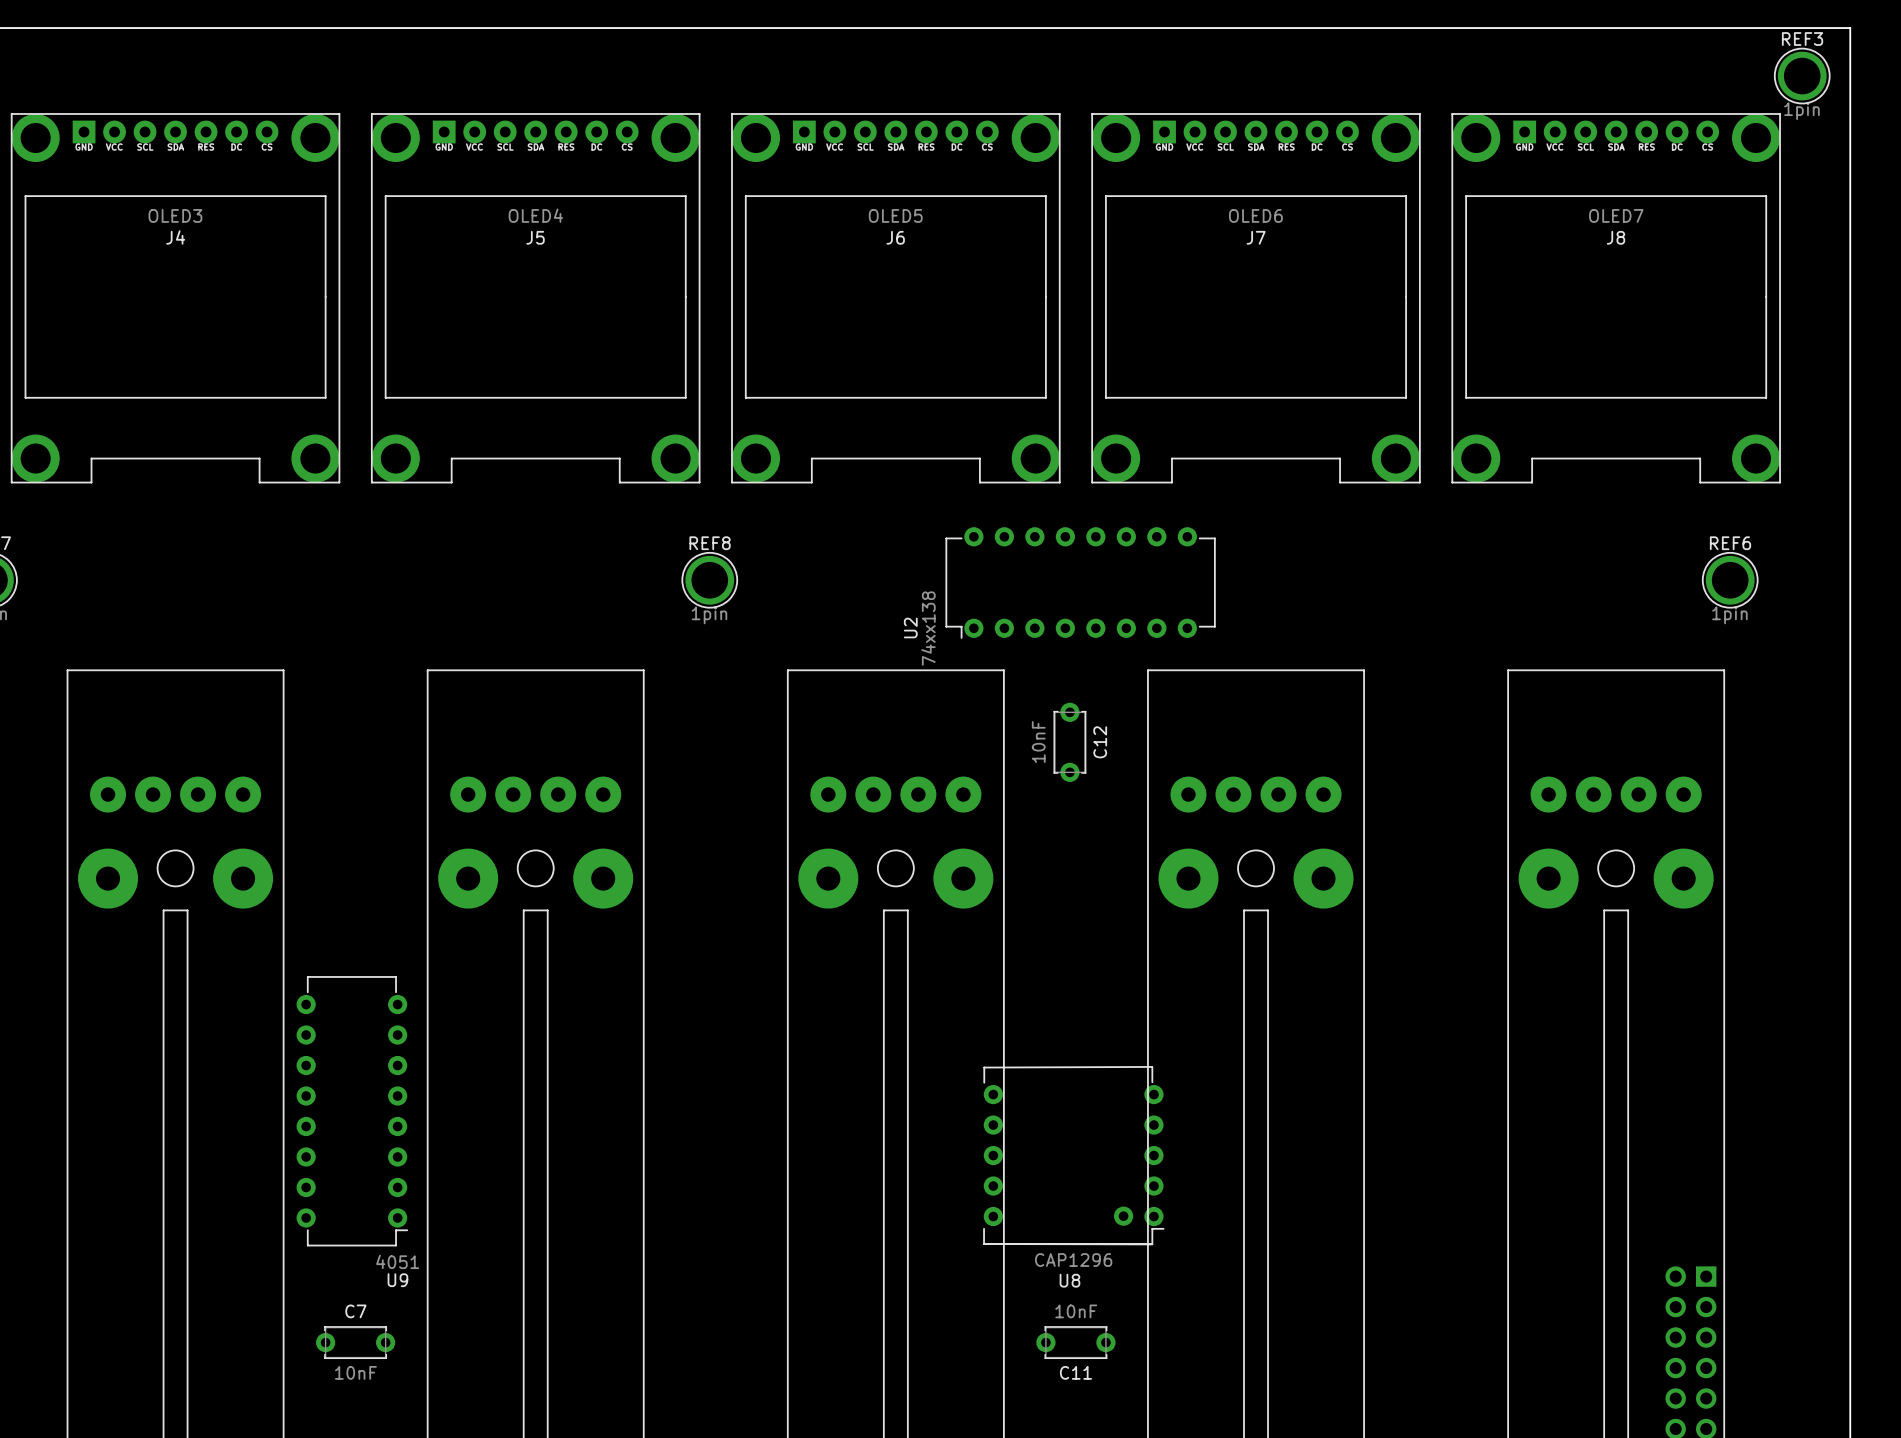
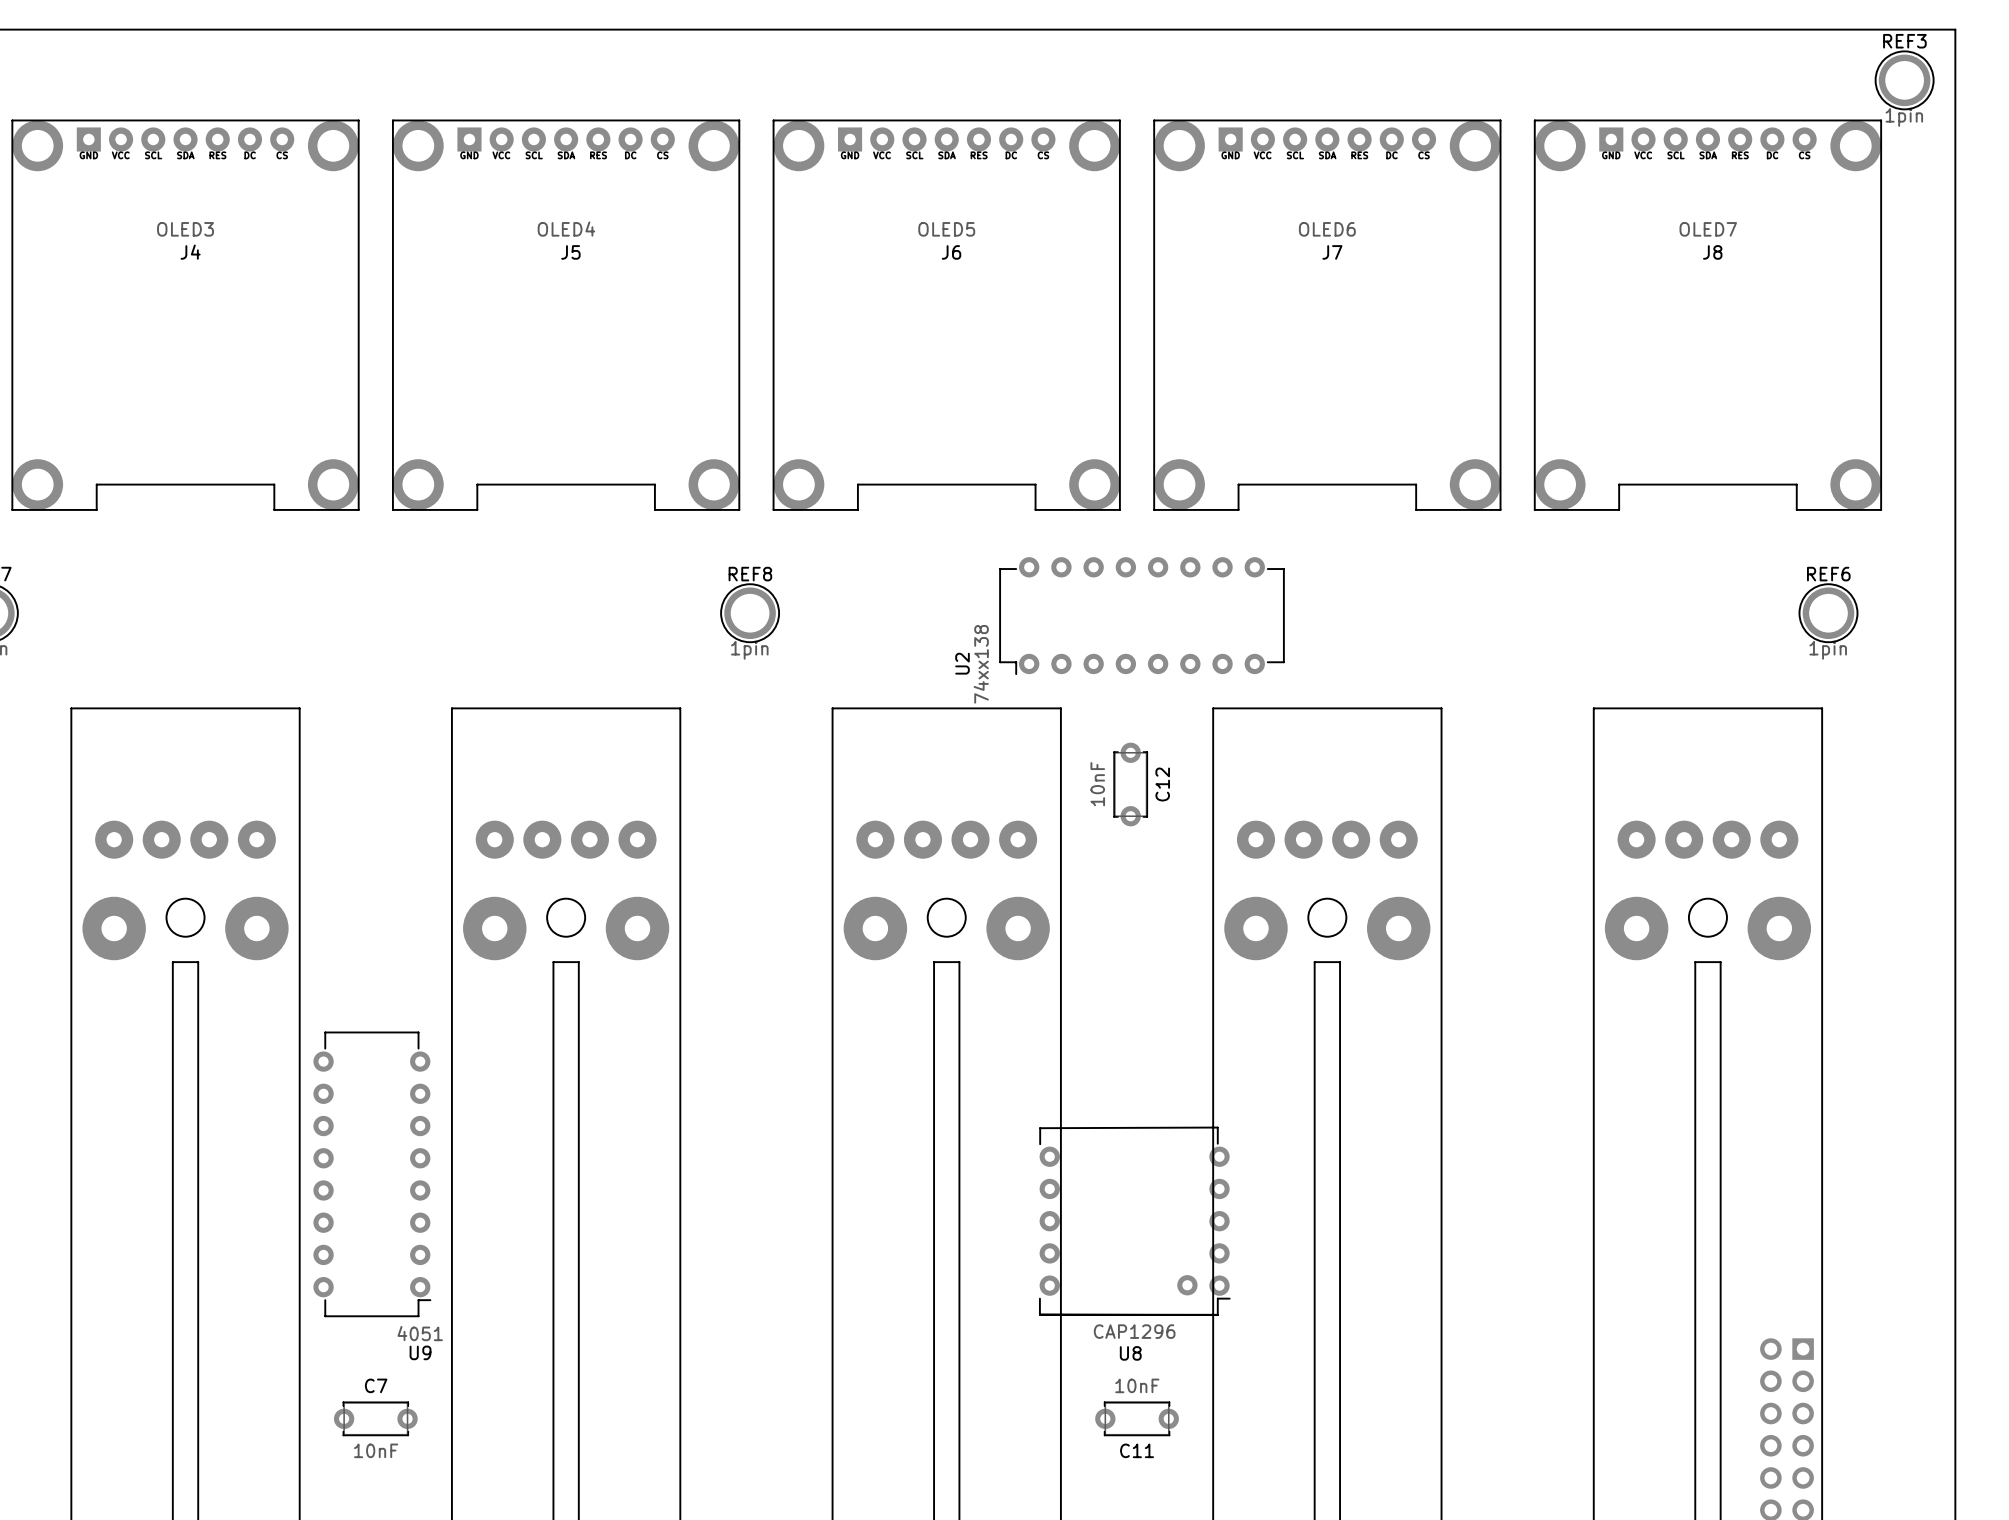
J4 footprint: [10, 113, 341, 484] -> [11, 119, 360, 511]
J5 footprint: [370, 113, 701, 484] -> [392, 119, 741, 511]
J6 footprint: [731, 113, 1061, 484] -> [772, 119, 1121, 511]
J7 footprint: [1091, 113, 1421, 484] -> [1153, 119, 1502, 511]
J8 footprint: [1451, 113, 1781, 484] -> [1533, 119, 1883, 511]

